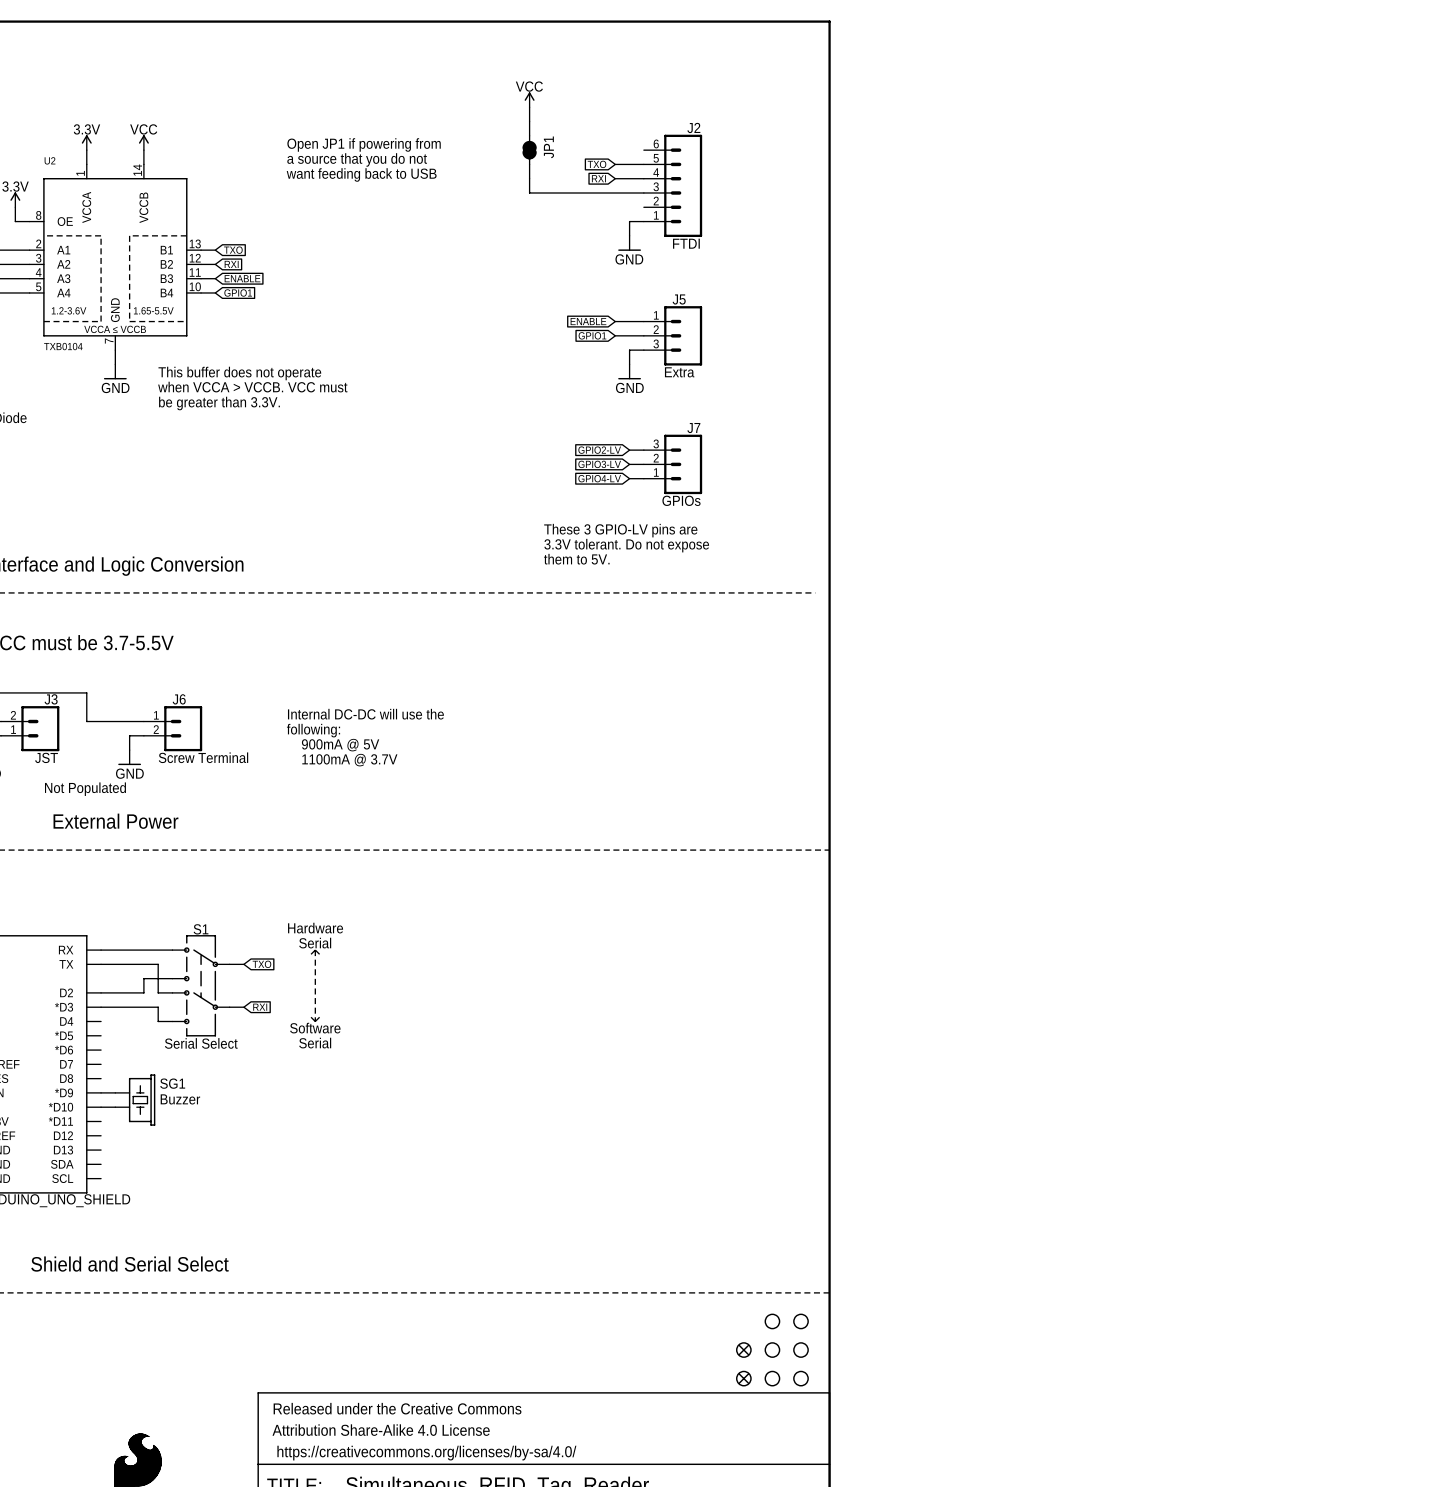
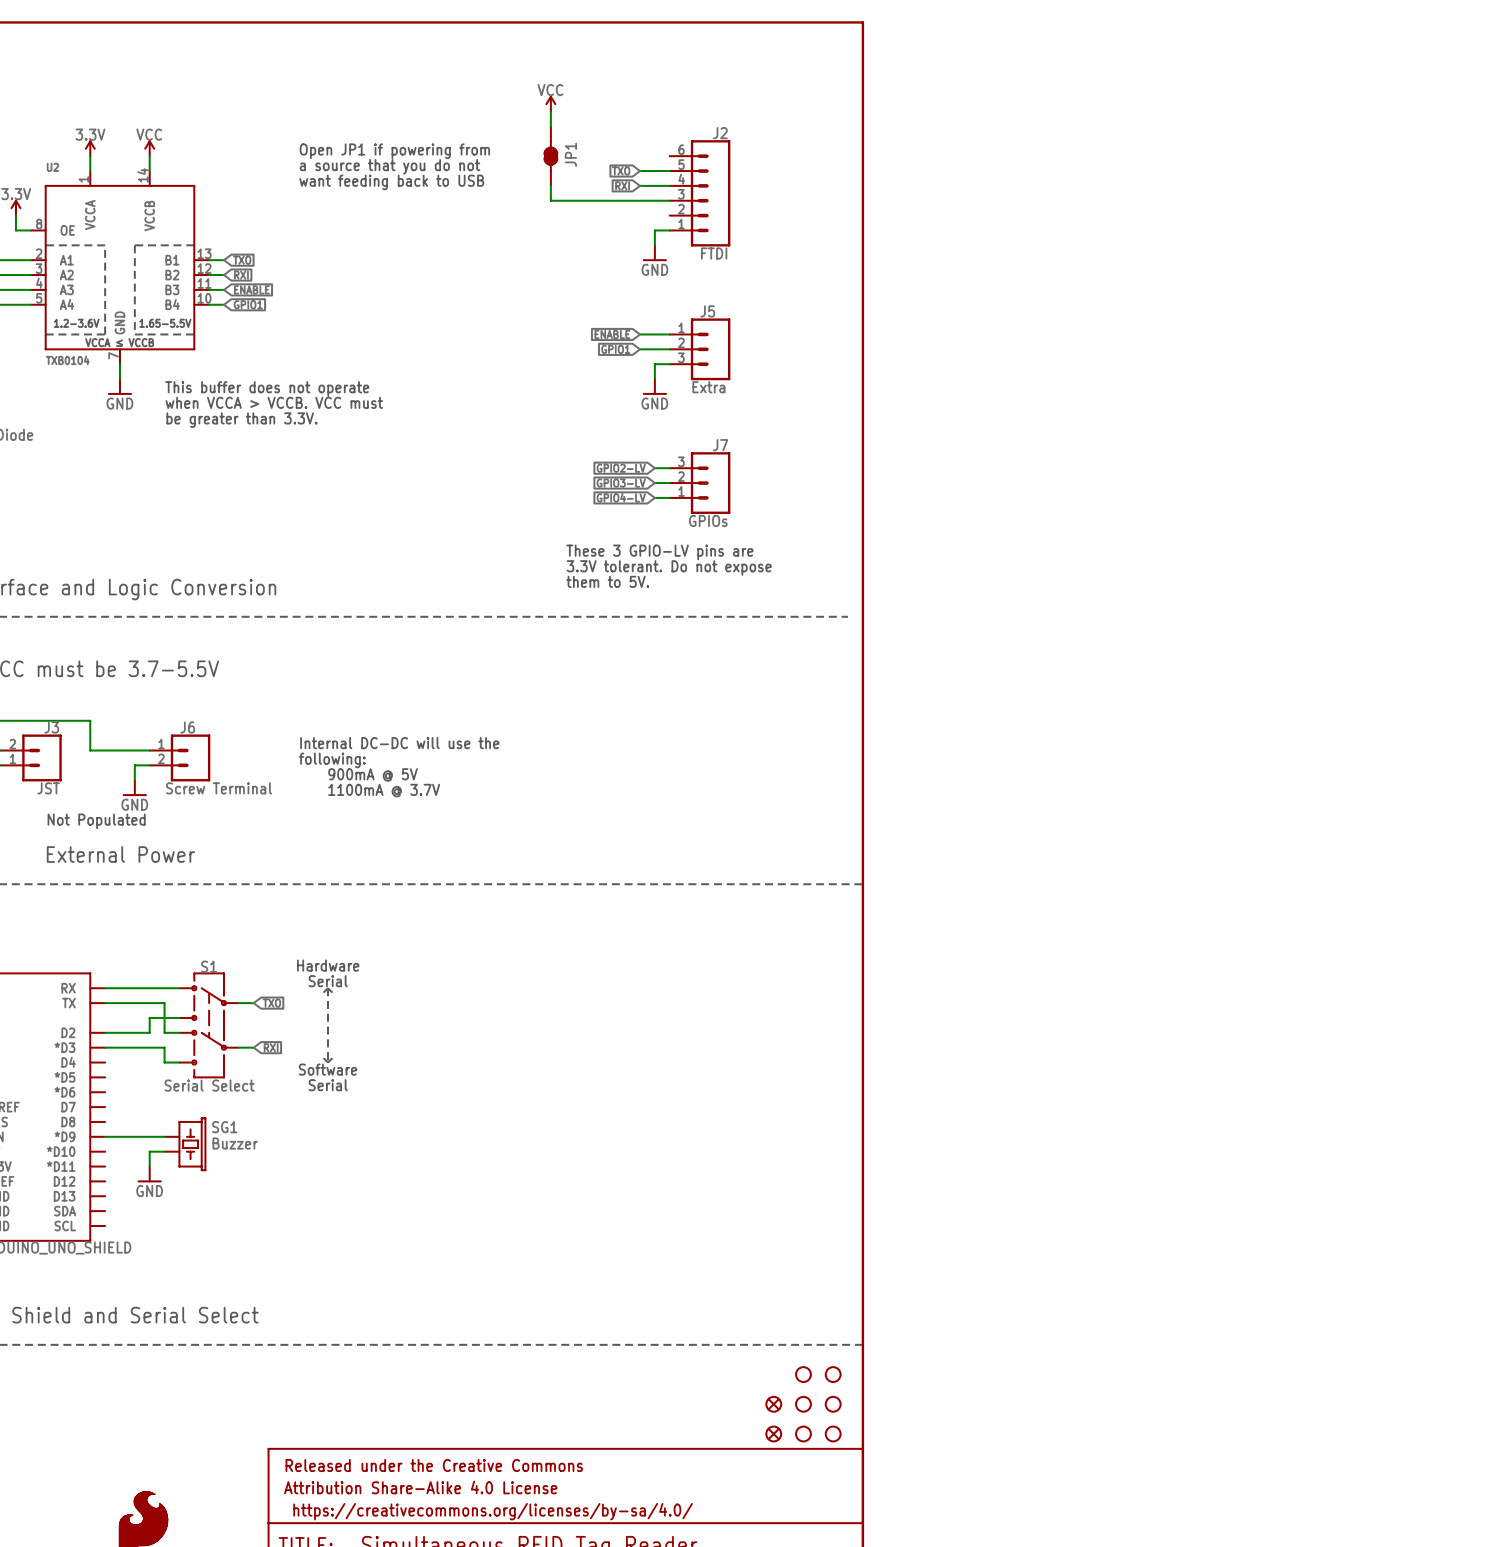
SG1 position: (135, 1100) -> (185, 1144)
wire: (101, 1107) (115, 1107) -> none
wire: none -> (164, 1151) (149, 1151) (149, 1166)
power symbol: none -> GND (149, 1174)

